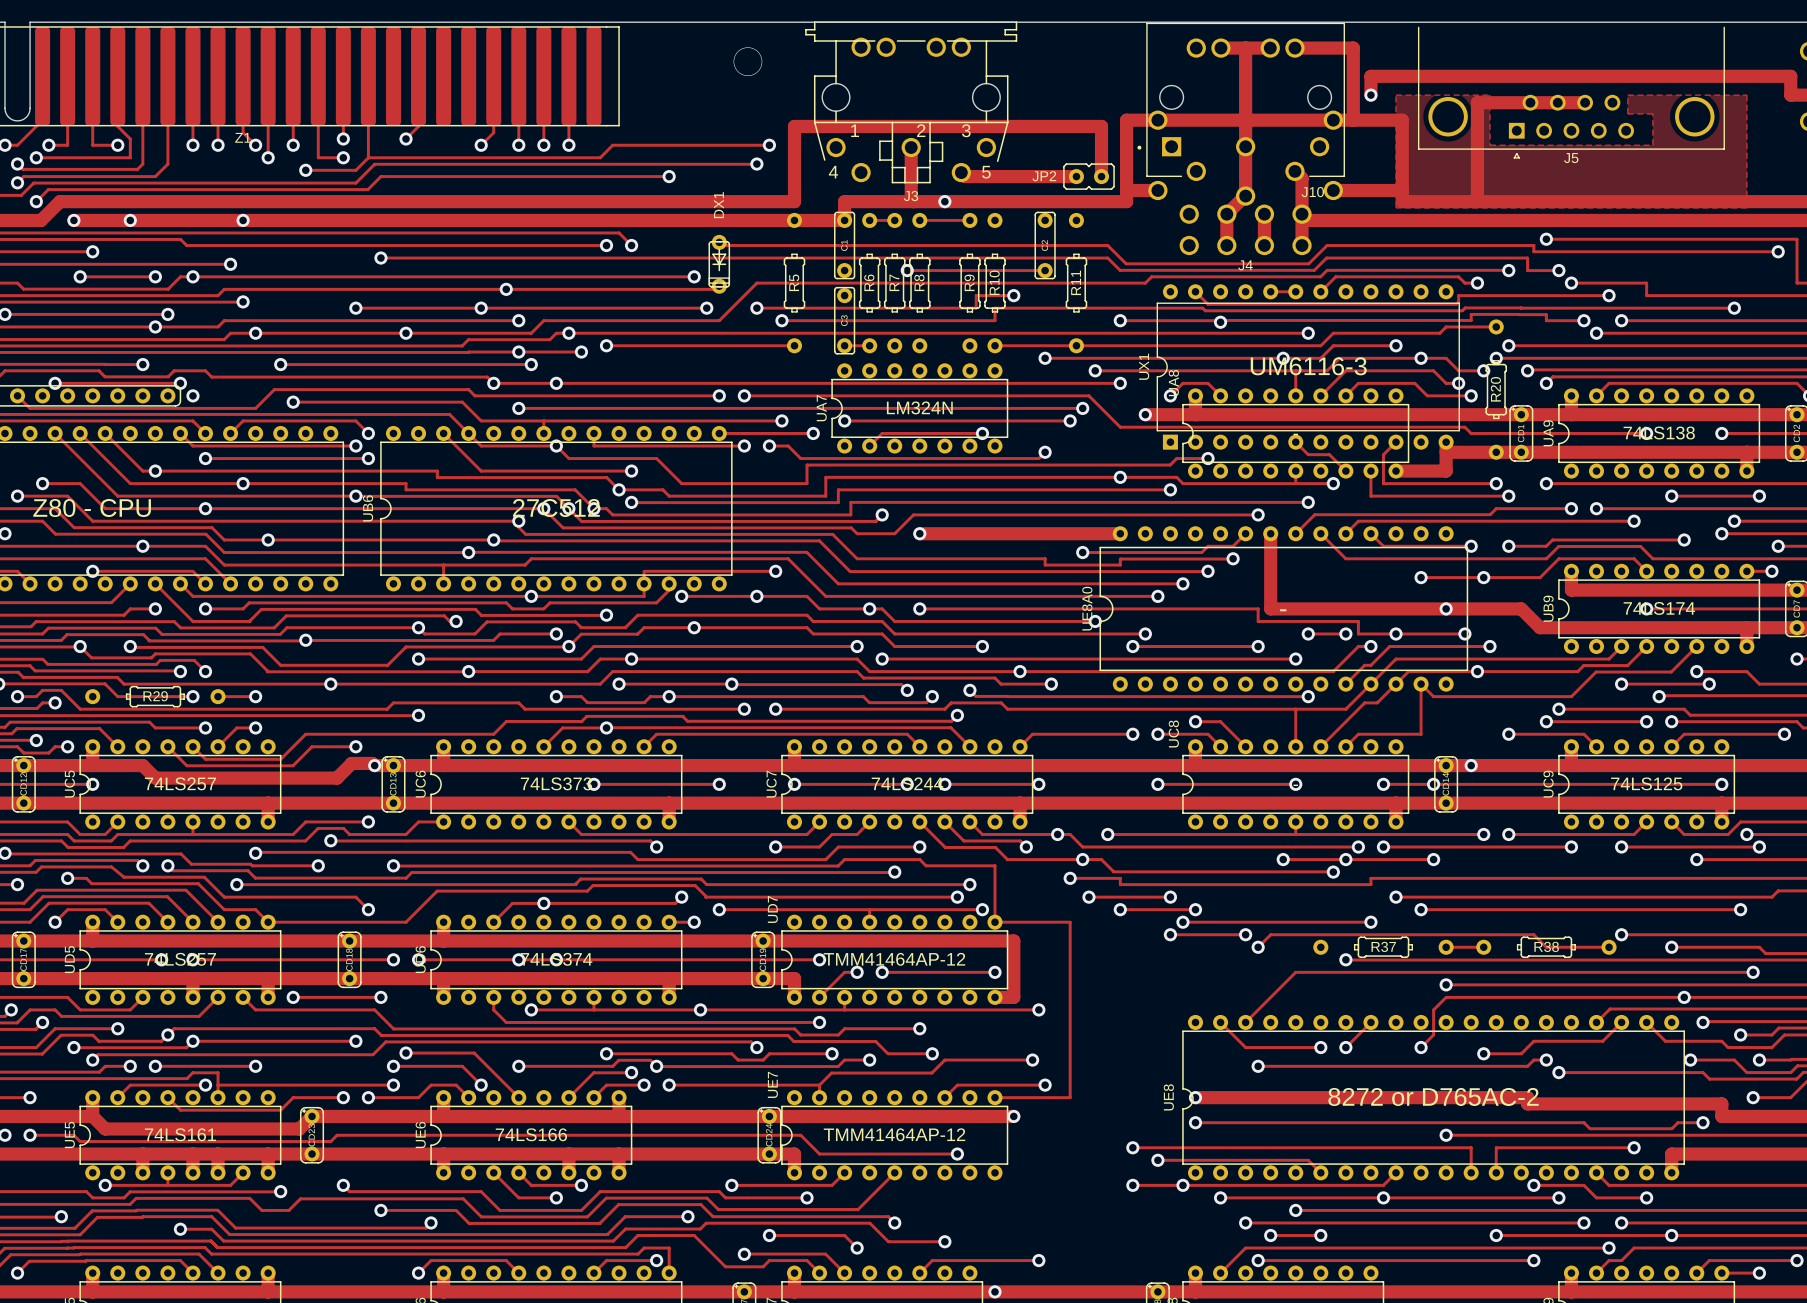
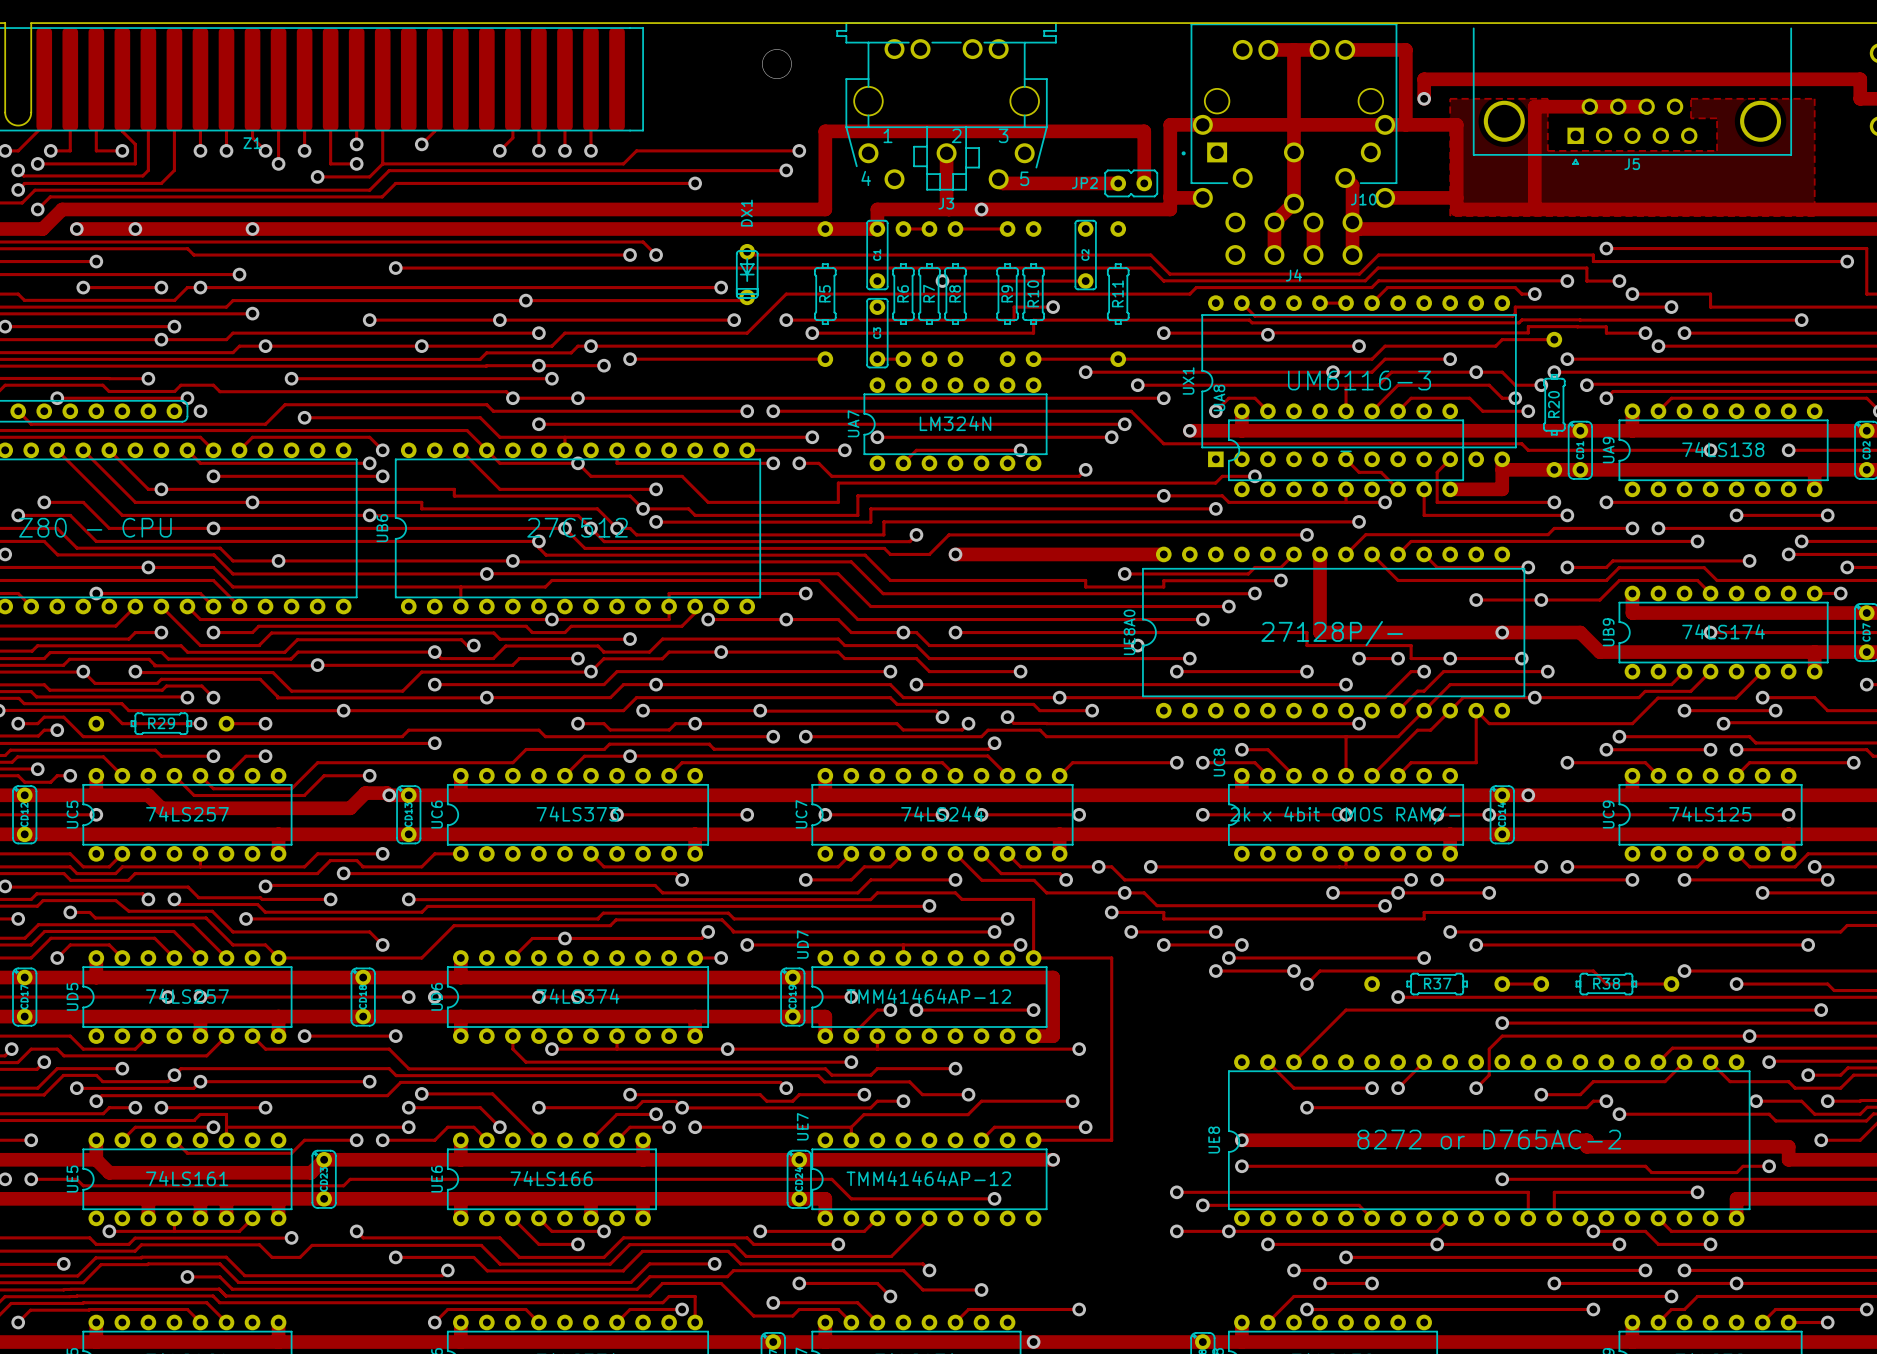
UE8A0 value: - (1283, 610) -> 27128P/- (1332, 633)
UC8 value: - (1295, 785) -> 2k x 4bit CMOS RAM/- (1345, 815)

